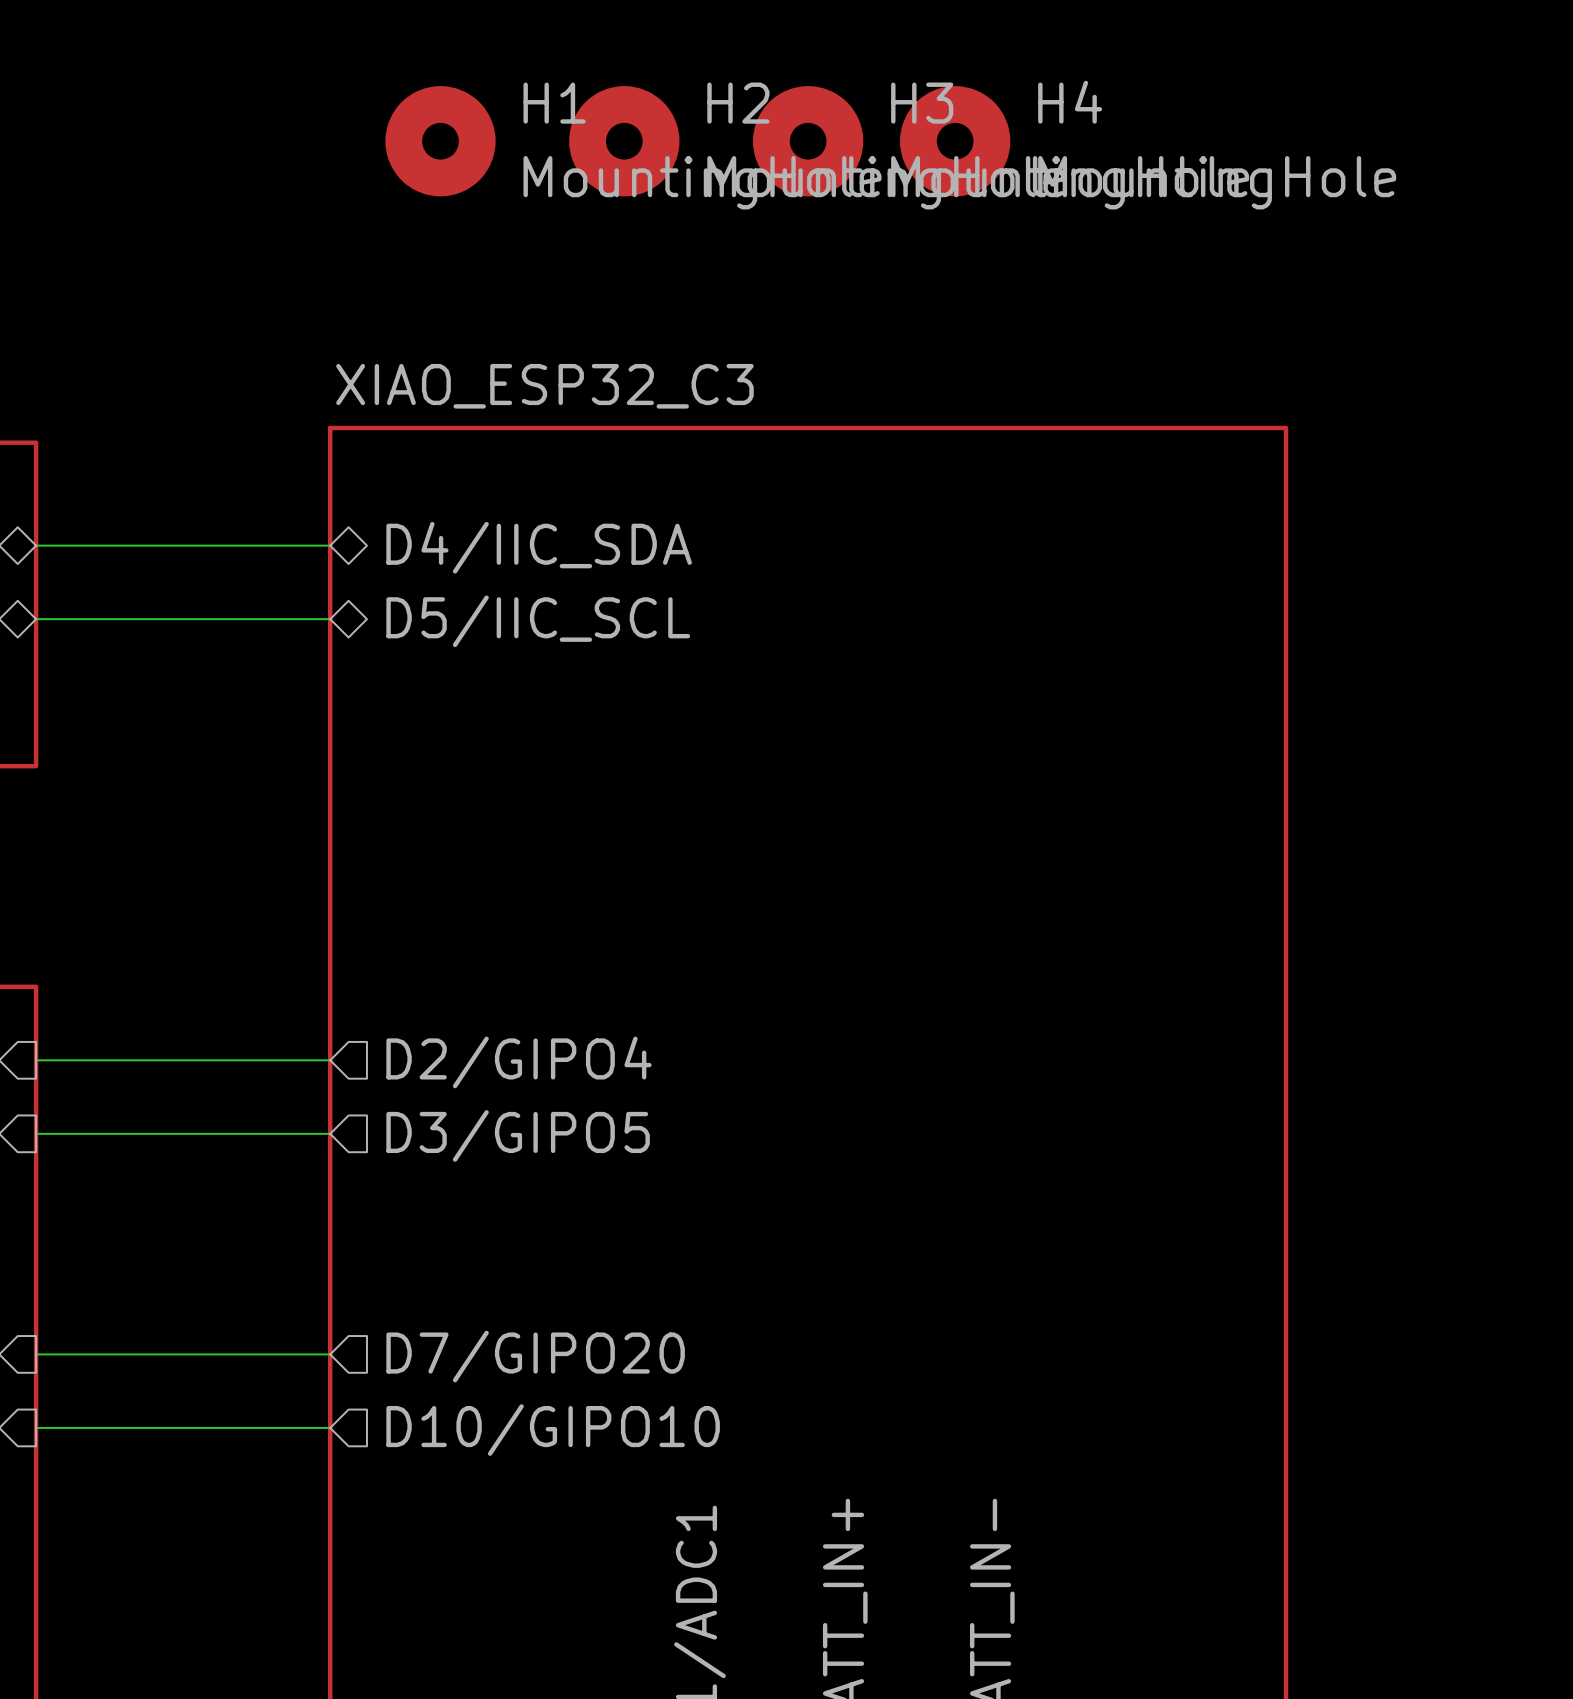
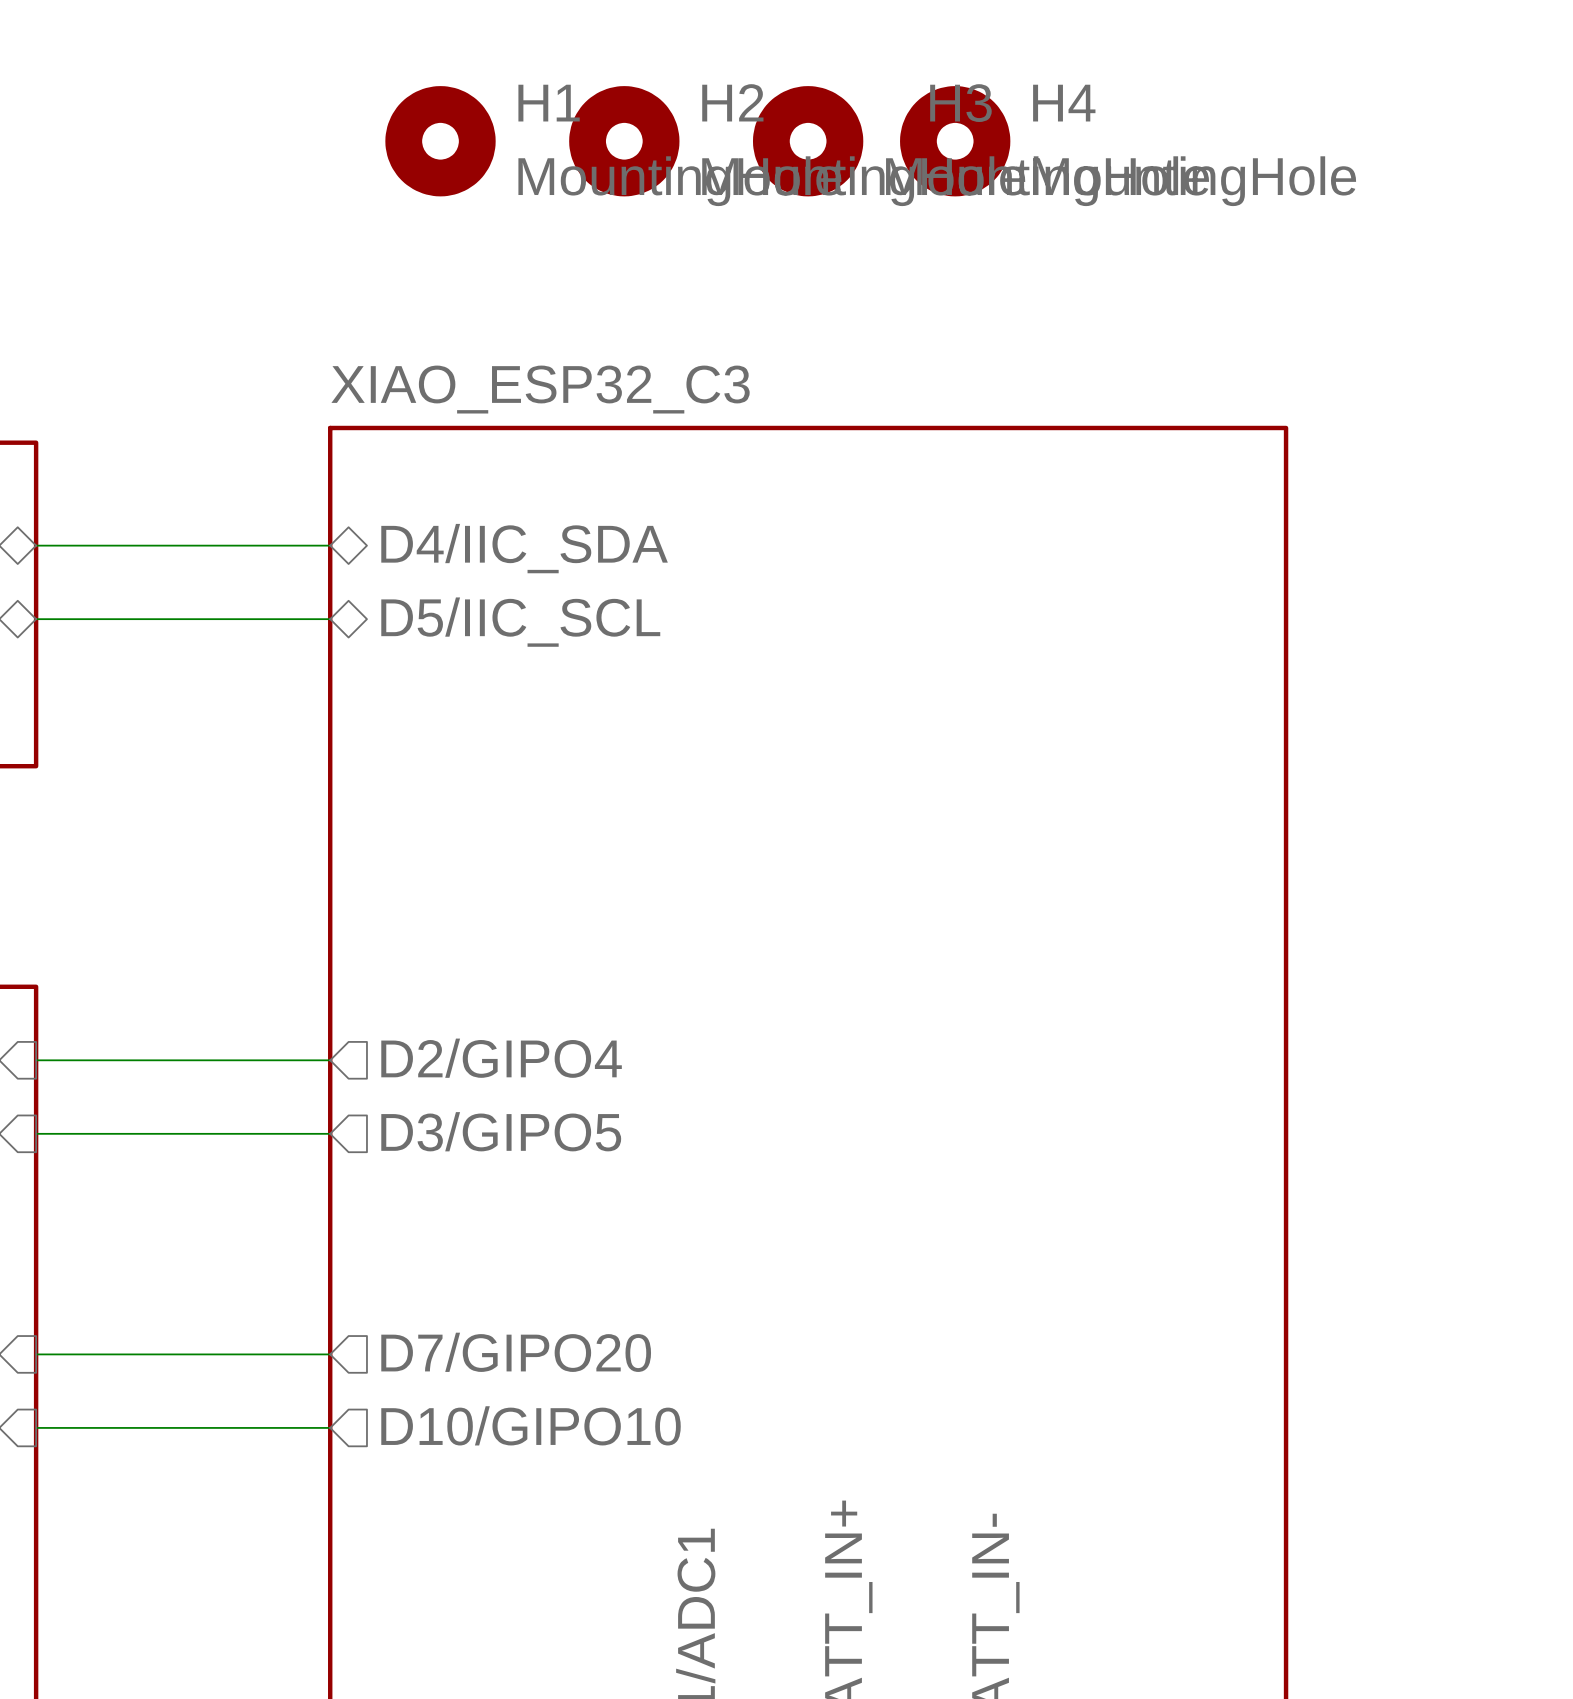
H3 name position: H3 (922, 103) -> H3 (960, 103)

